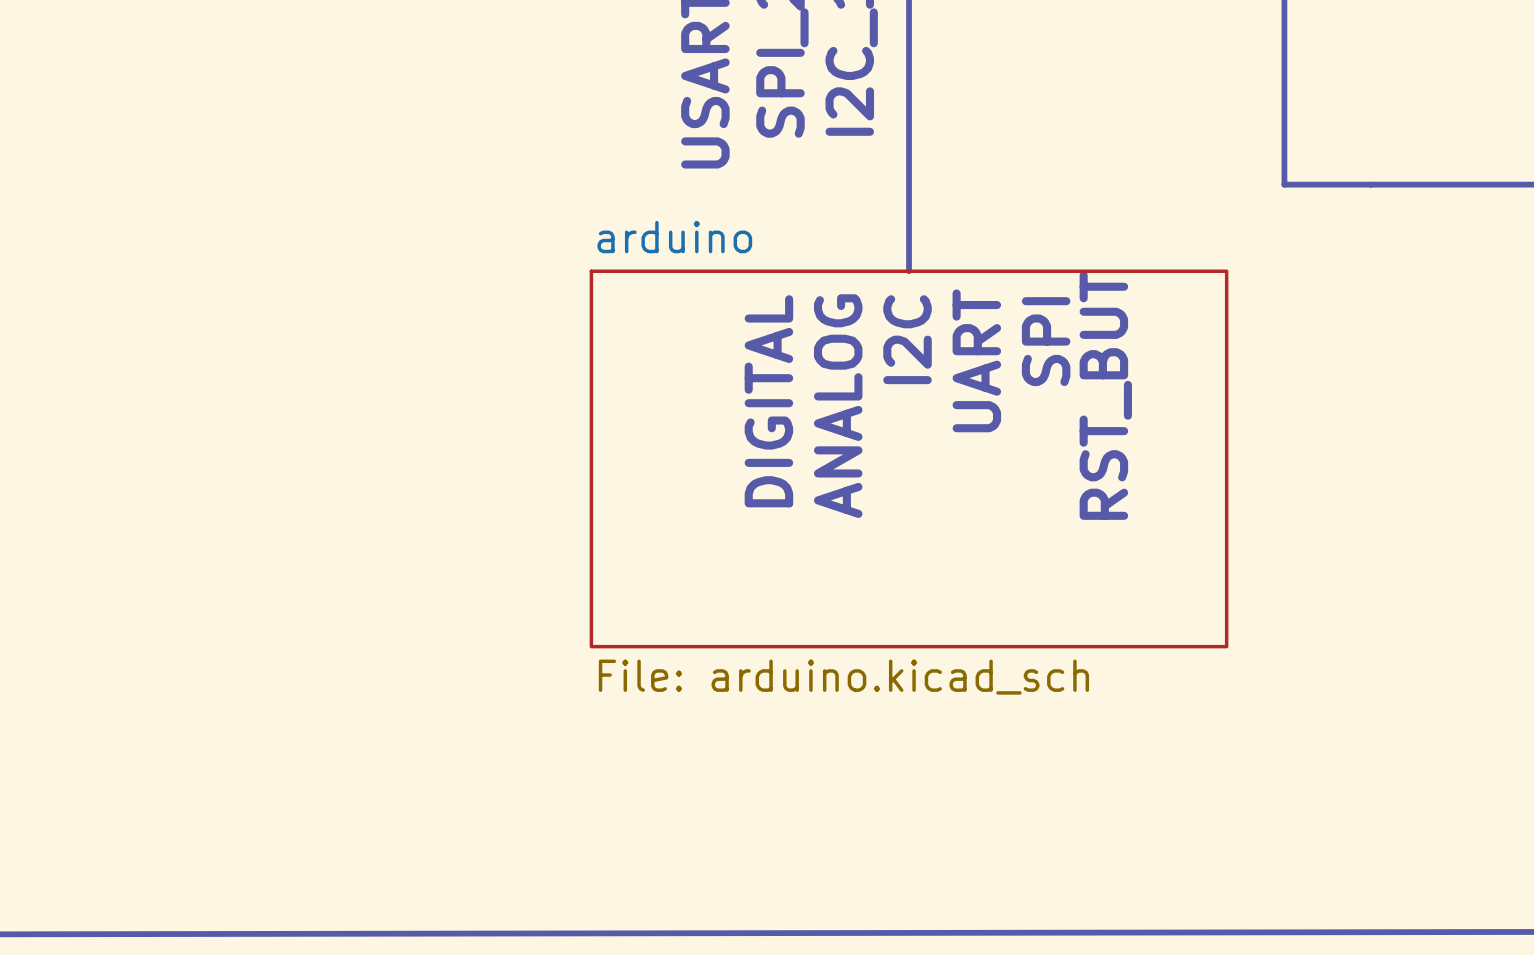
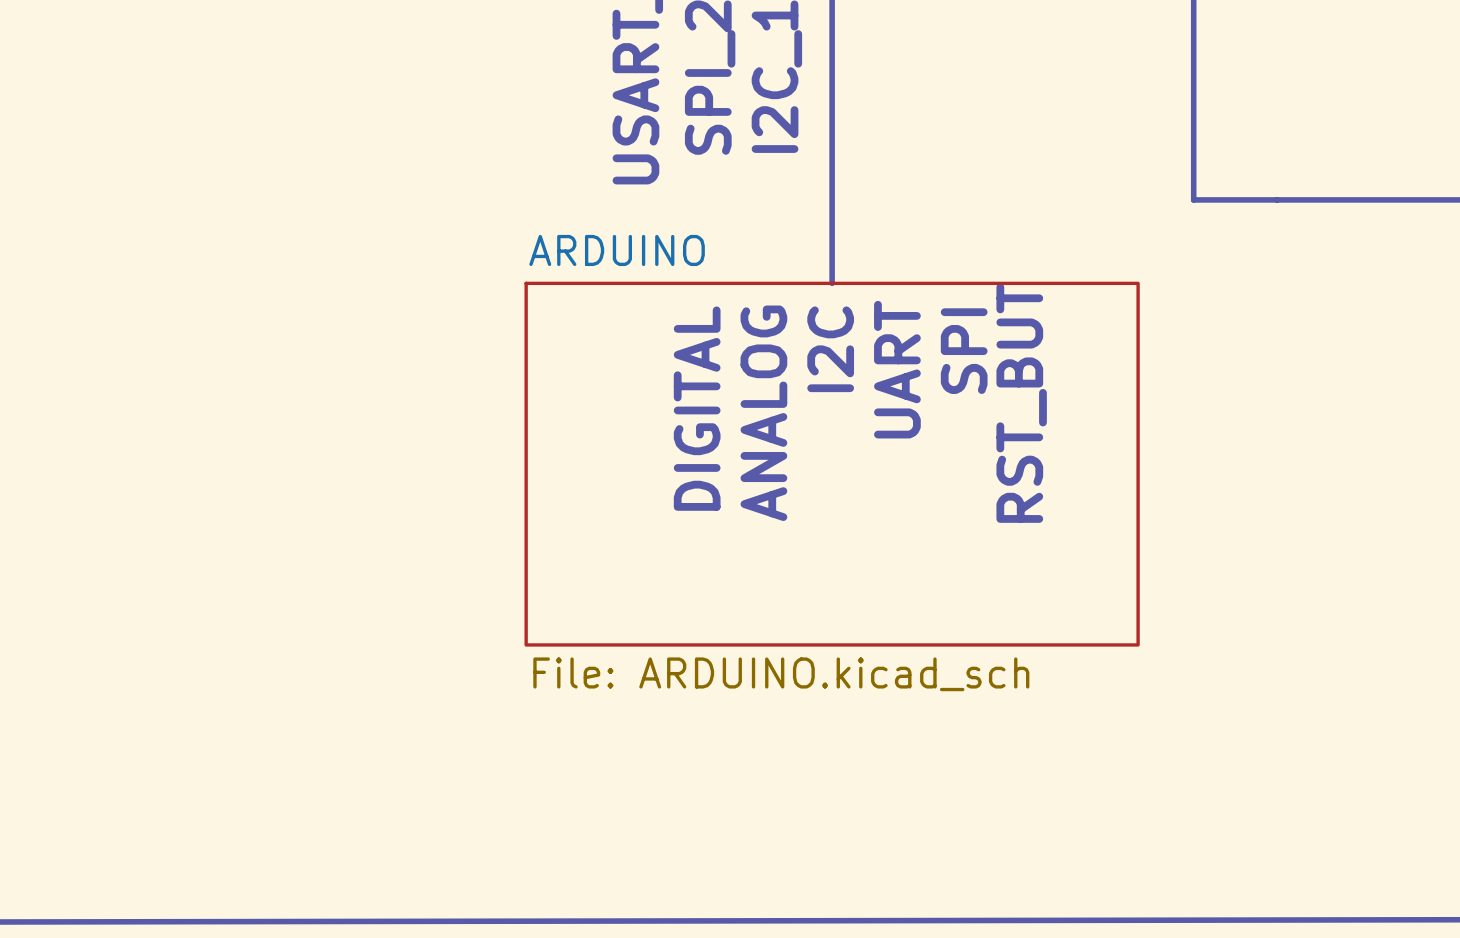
sheet arduino name: arduino (674, 237) -> ARDUINO (617, 250)
sheet arduino value: File: arduino.kicad_sch (843, 677) -> File: ARDUINO.kicad_sch (781, 674)

